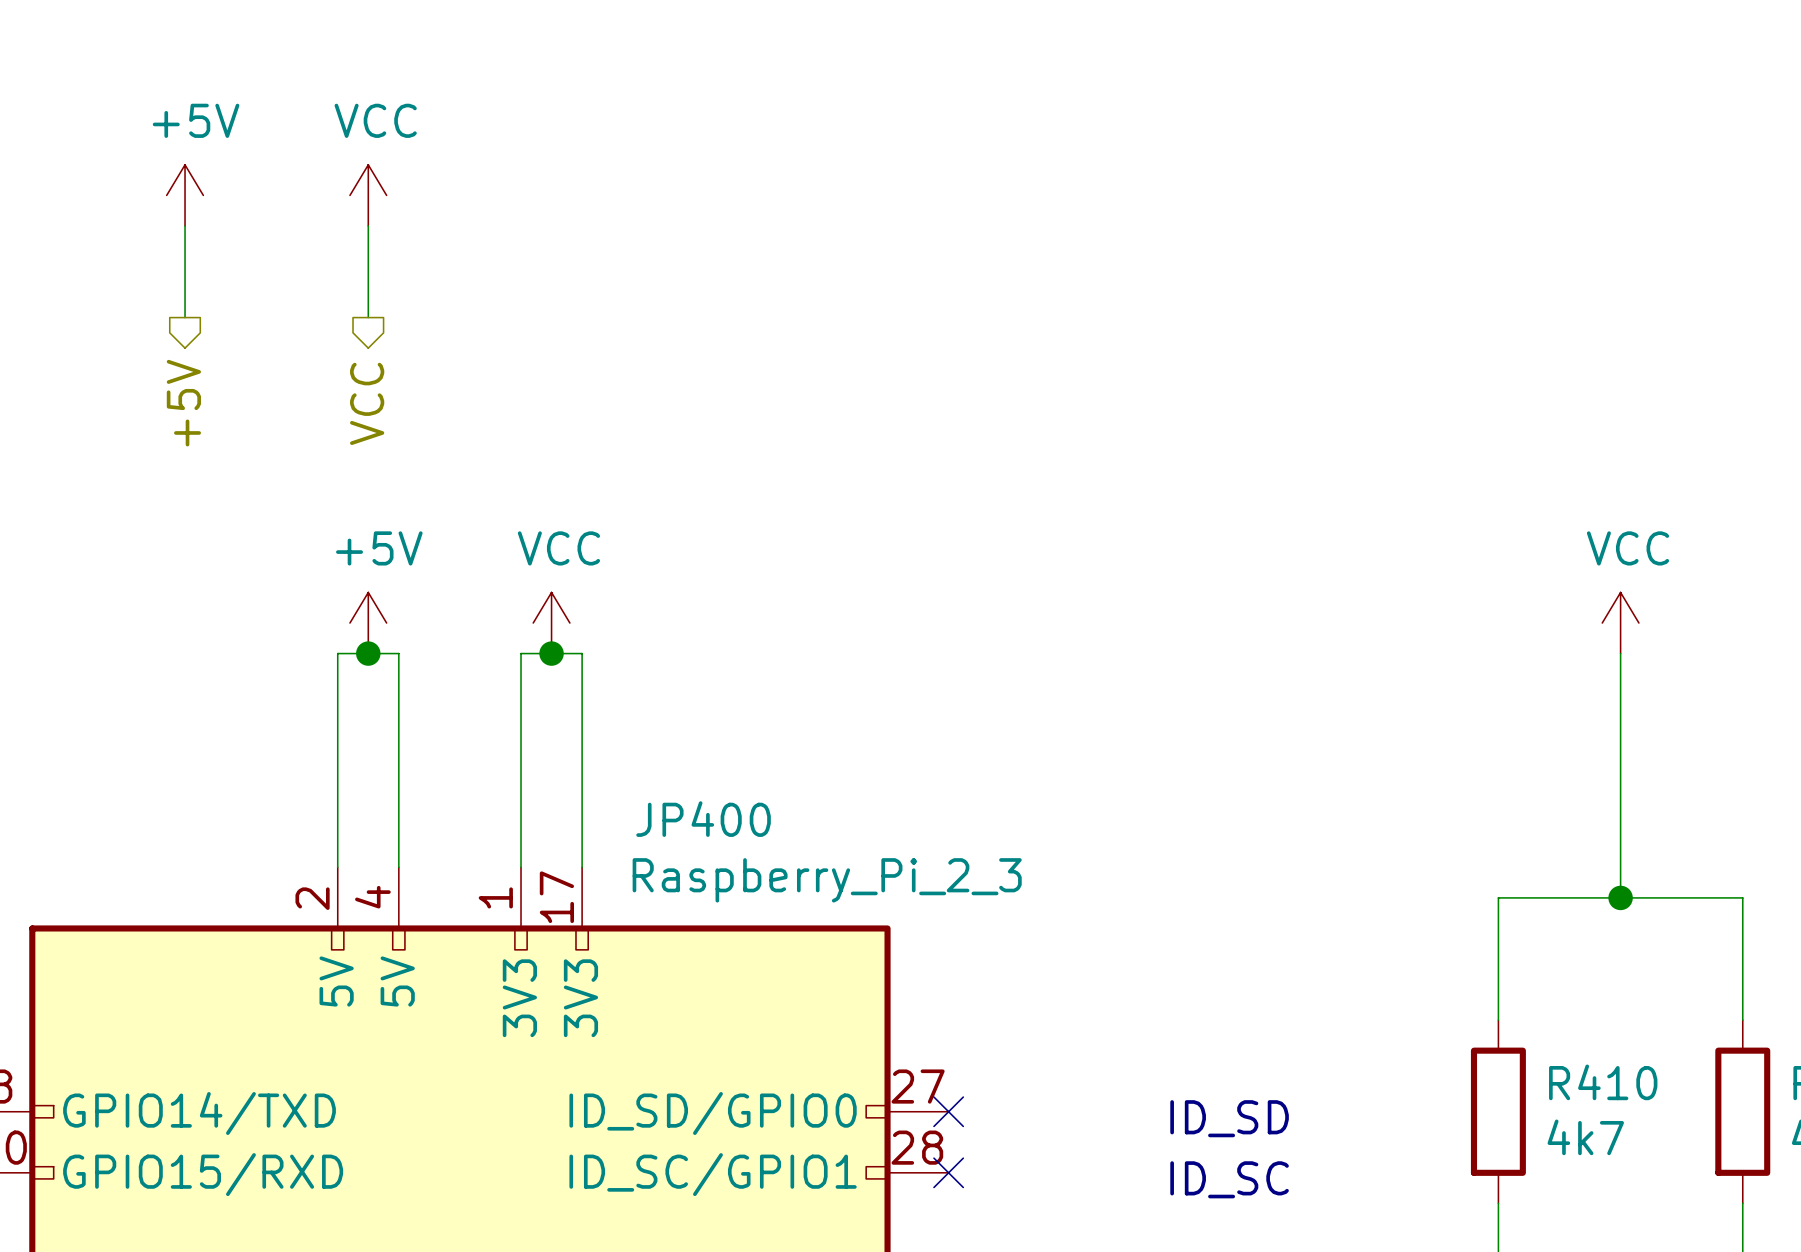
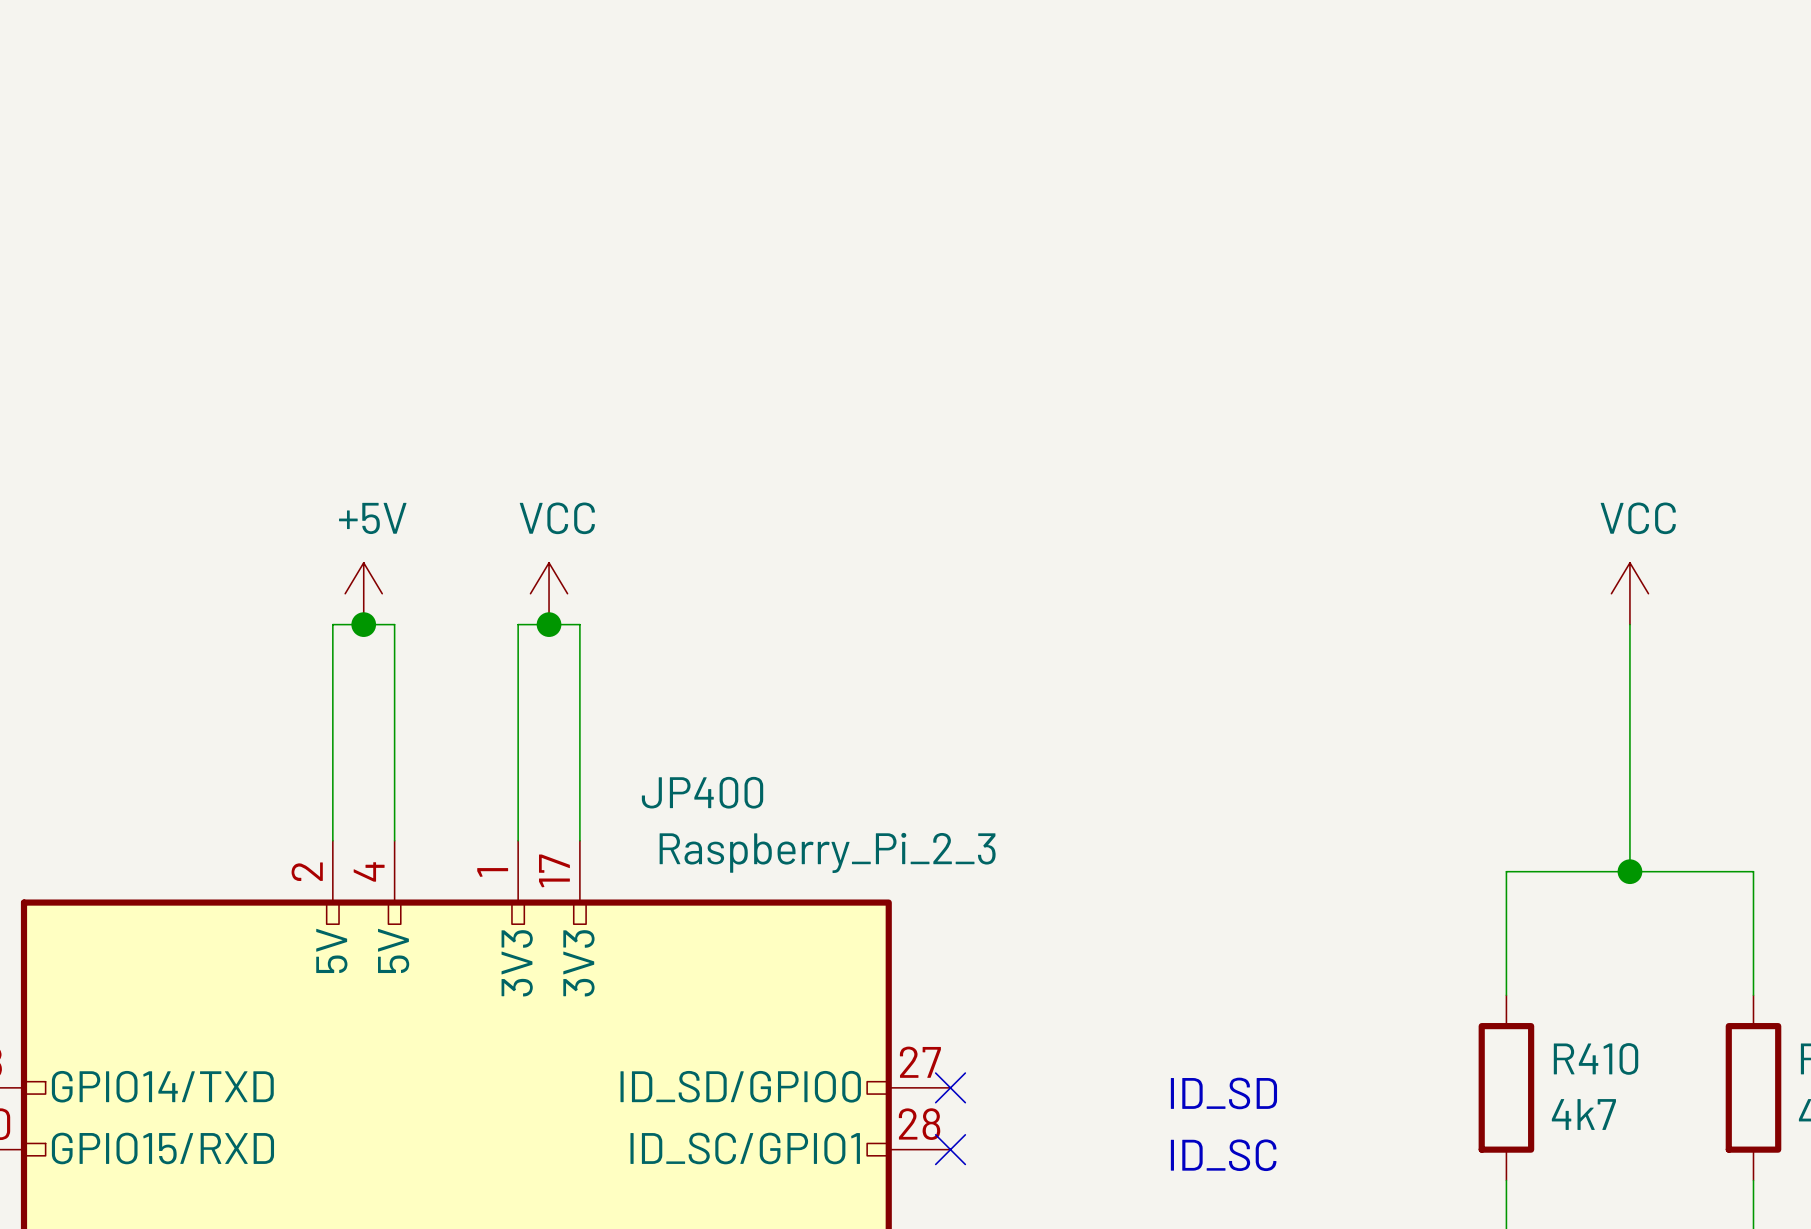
power symbol: +5V (185, 195) -> none
power symbol: VCC (368, 195) -> none
wire: (185, 225) (185, 317) -> none
wire: (368, 225) (368, 317) -> none
hierarchical label: +5V (183, 403) -> none
hierarchical label: VCC (367, 403) -> none

